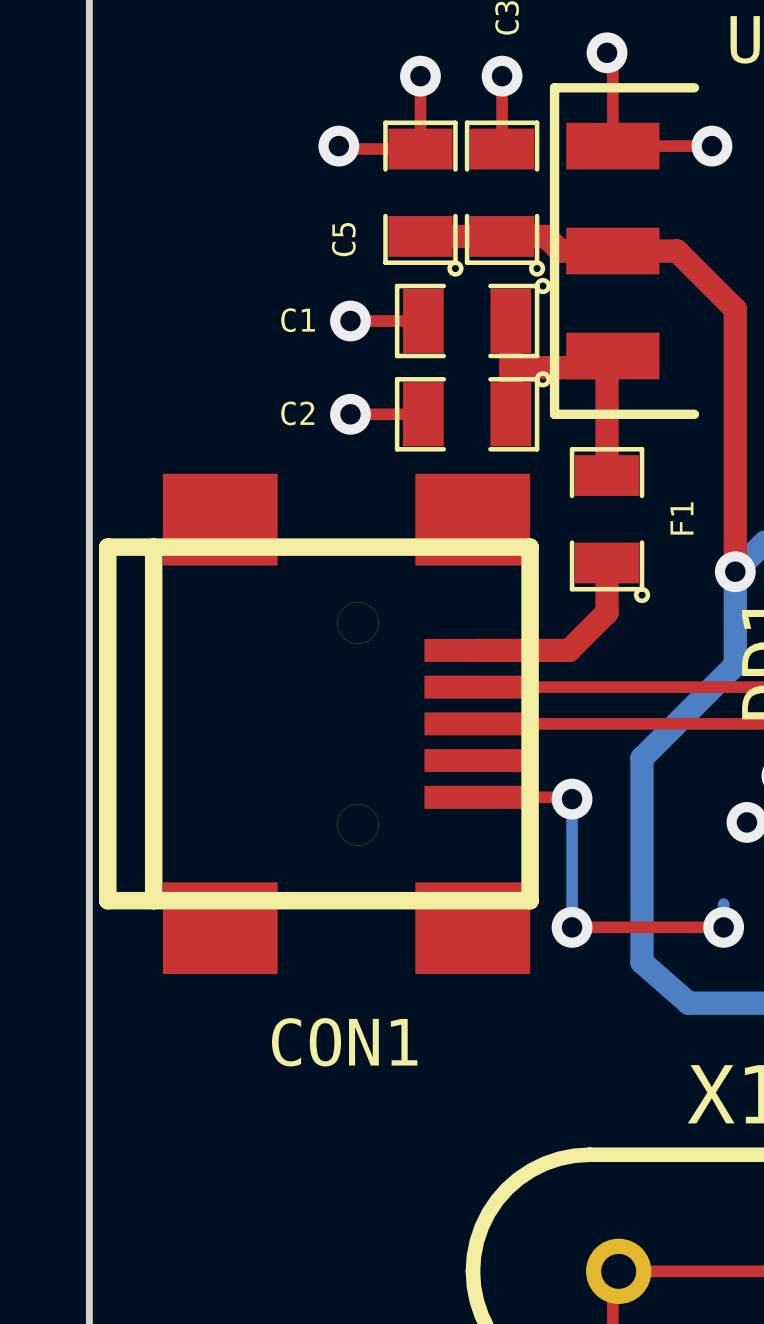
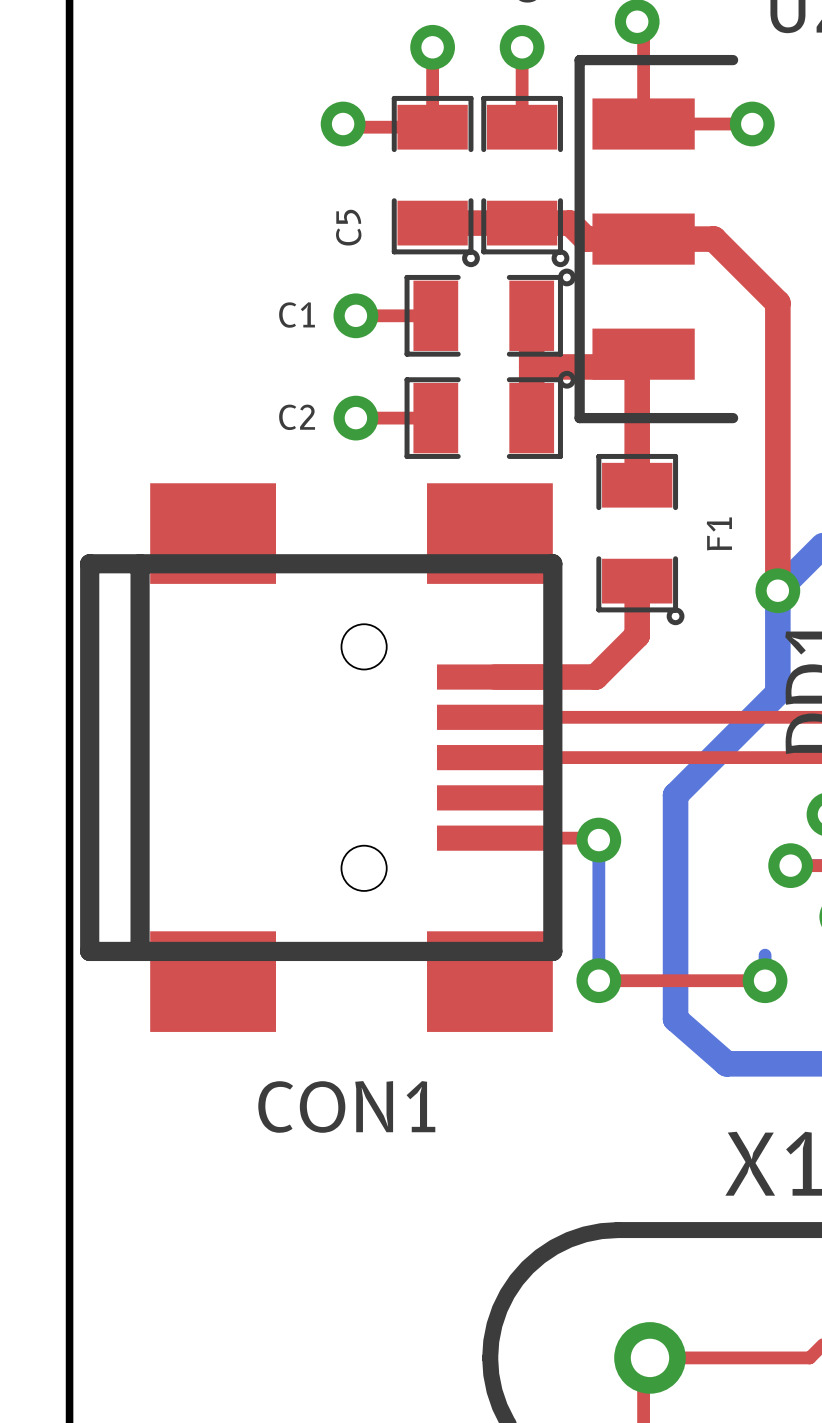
CON1 footprint: [99, 473, 539, 975] -> [80, 483, 563, 1032]

